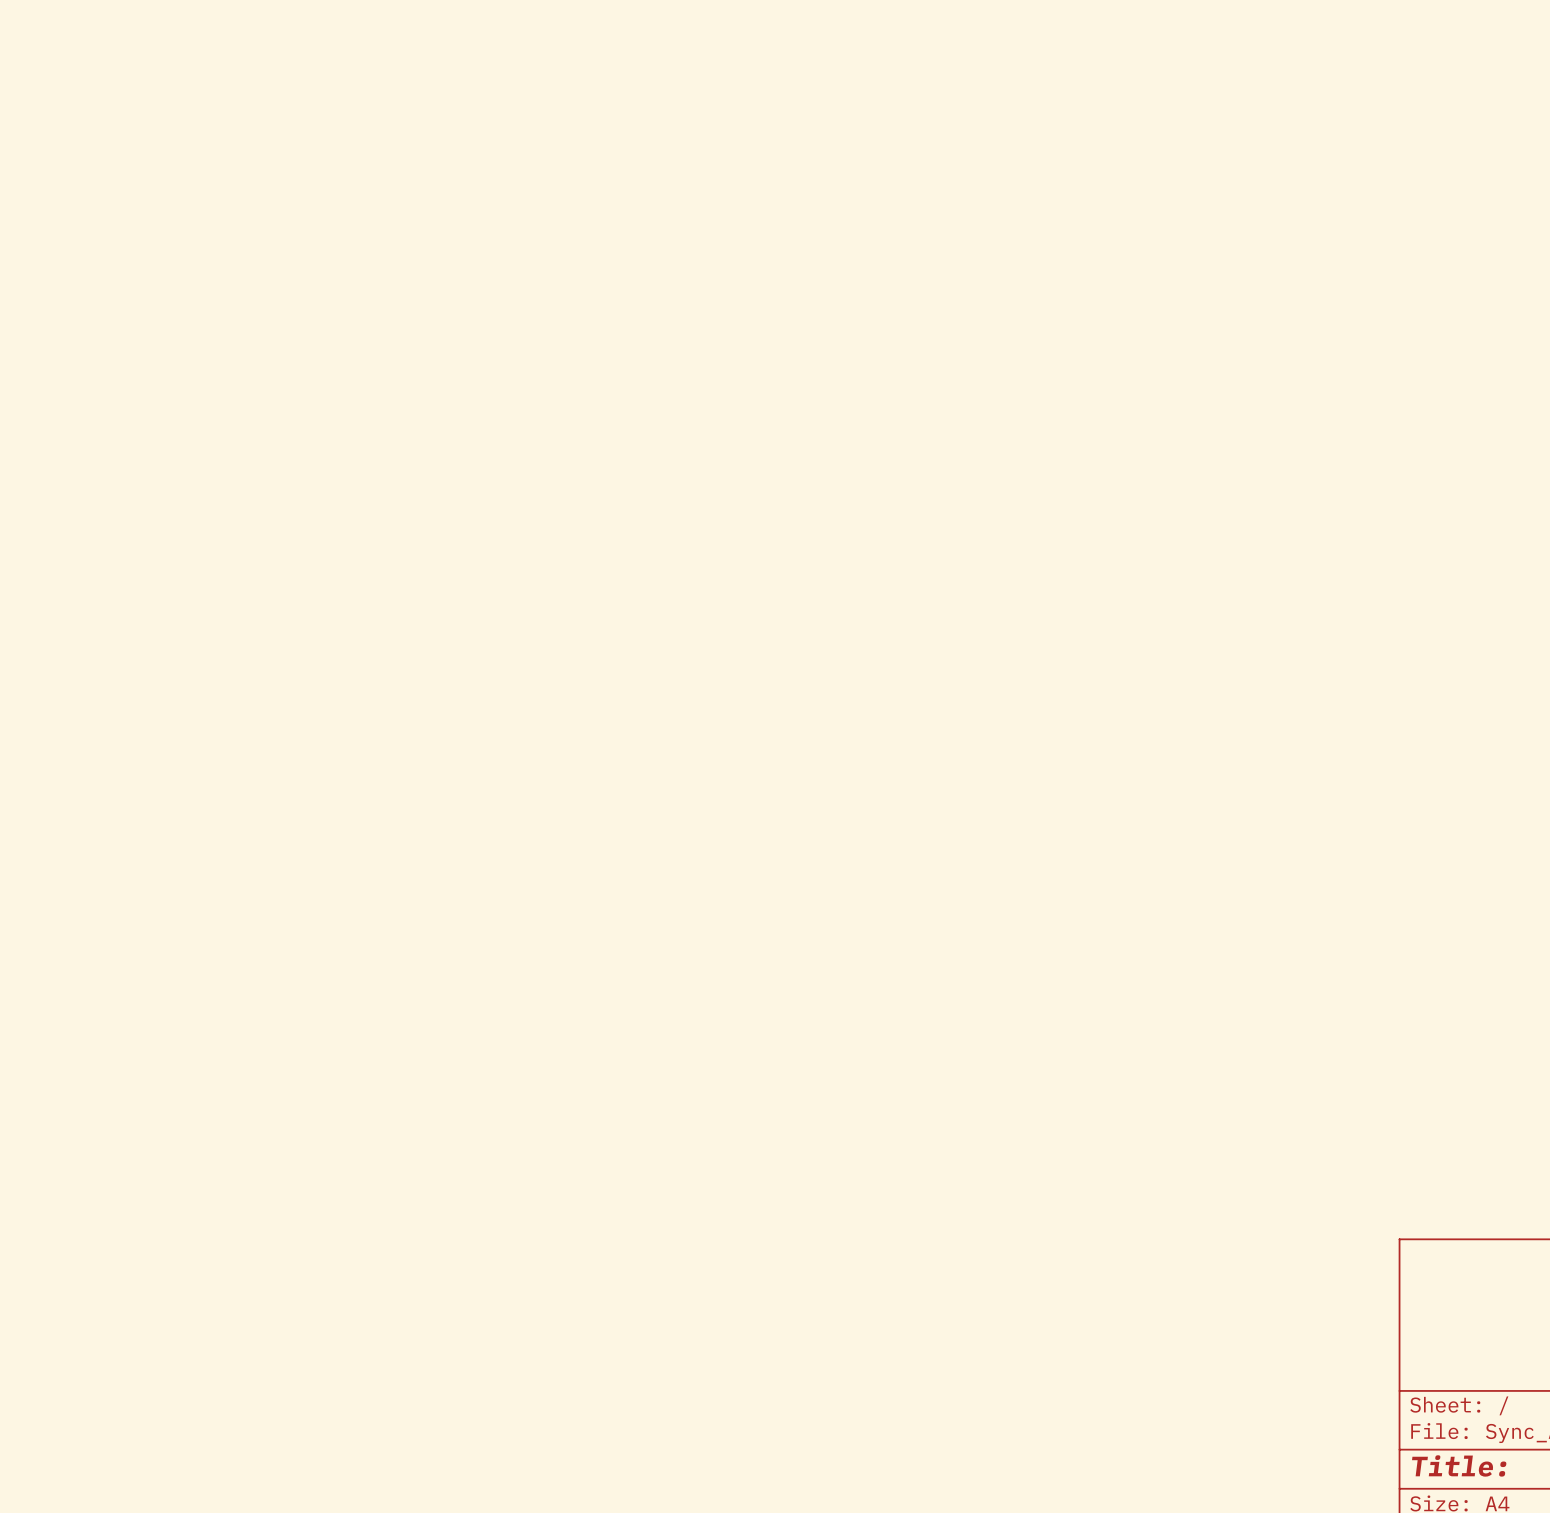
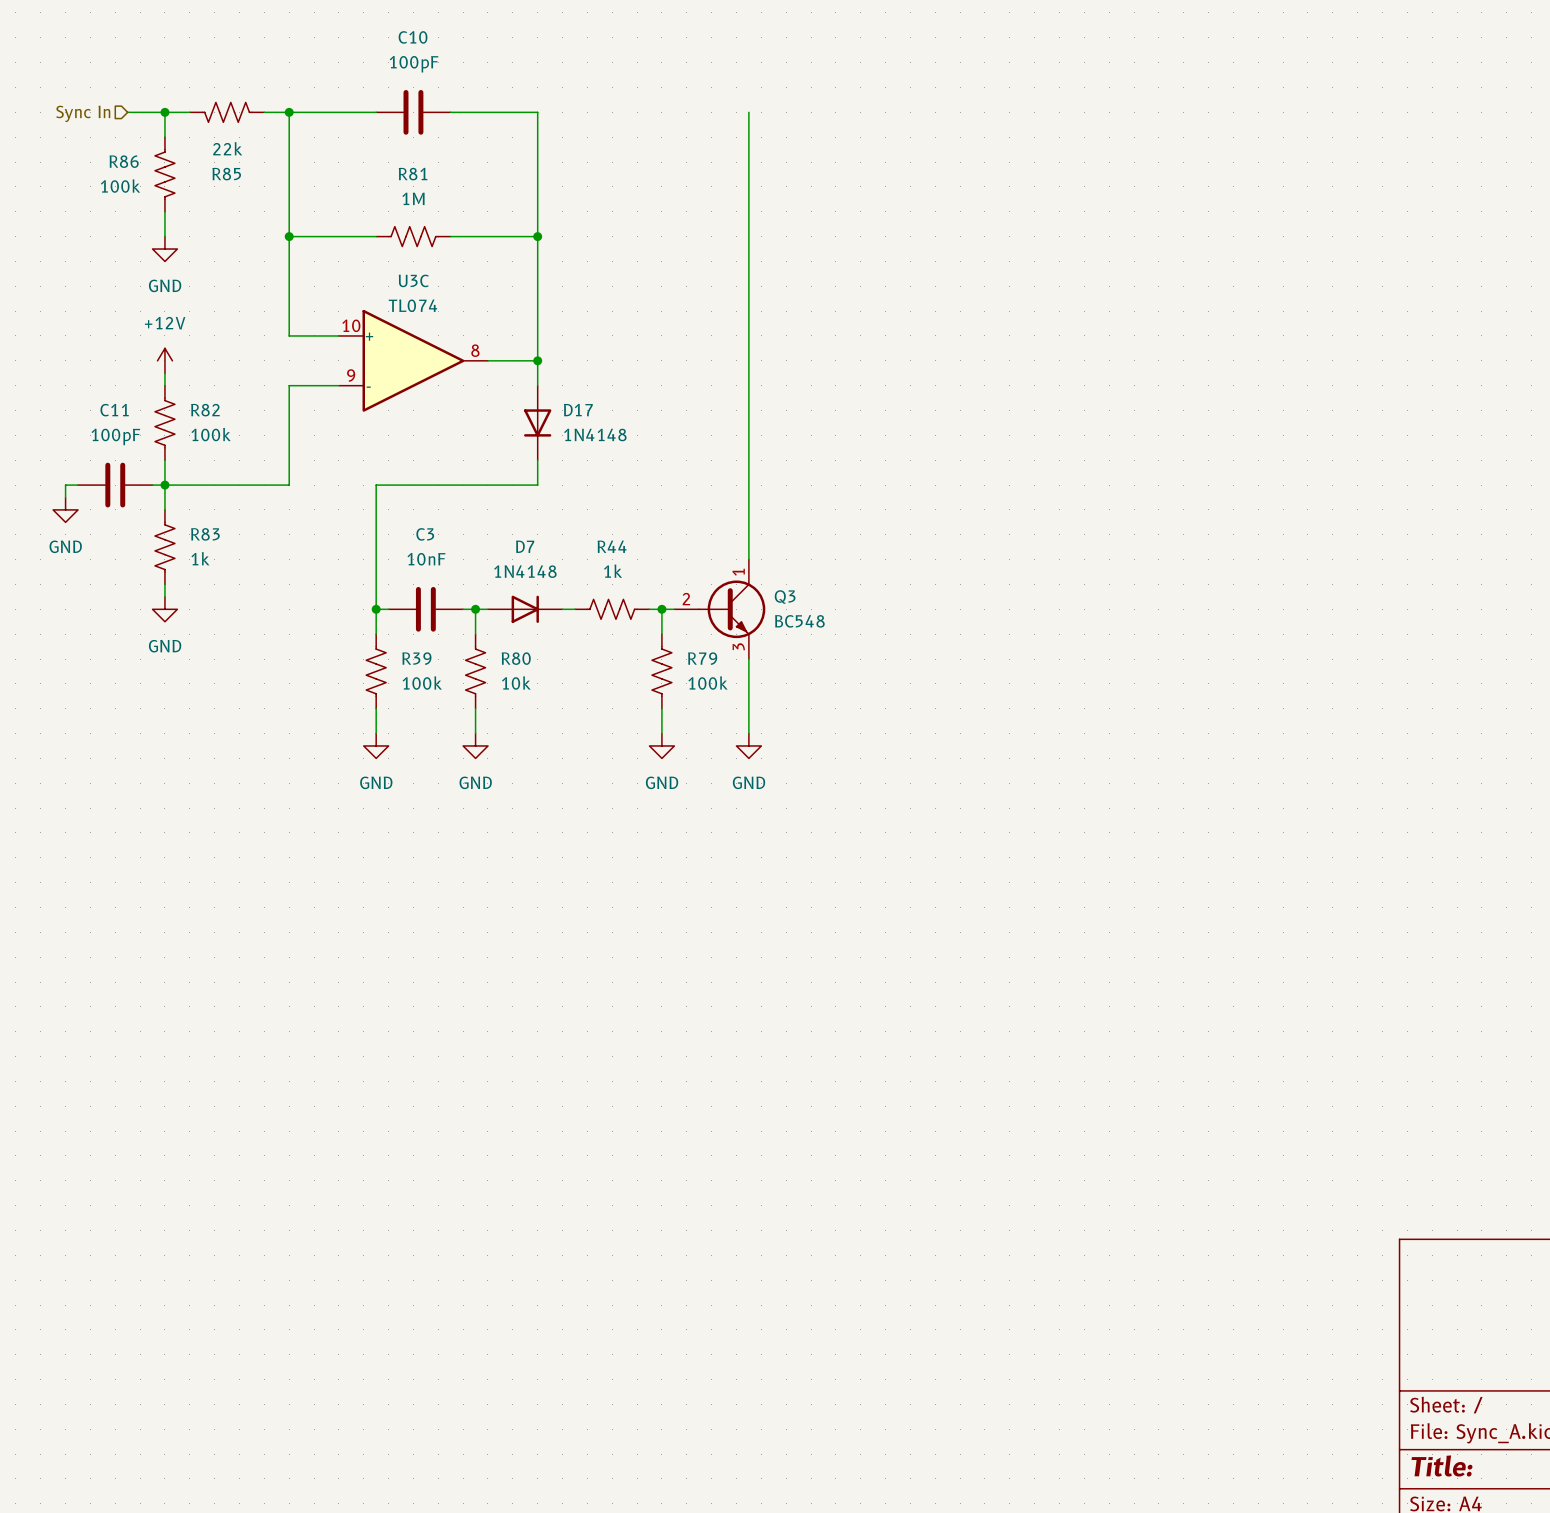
wire: none -> (127, 112) (189, 112)
wire: none -> (164, 112) (164, 137)
junction: none -> (164, 112)
R85: none -> 22k (227, 112)
wire: none -> (264, 112) (376, 112)
wire: none -> (289, 112) (289, 335) (338, 335)
junction: none -> (289, 112)
C10: none -> 100pF (413, 112)
wire: none -> (450, 112) (537, 112) (537, 385)
wire: none -> (748, 112) (748, 559)
hierarchical label: none -> Sync In (83, 113)
R86: none -> 100k (164, 174)
wire: none -> (164, 211) (164, 236)
wire: none -> (289, 236) (376, 236)
junction: none -> (289, 236)
R81: none -> 1M (413, 236)
wire: none -> (450, 236) (537, 236)
junction: none -> (537, 236)
power symbol: none -> GND (164, 249)
power symbol: none -> +12V (164, 360)
U3C: none -> TL074 (413, 360)
wire: none -> (487, 360) (537, 360)
junction: none -> (537, 360)
wire: none -> (164, 373) (164, 385)
wire: none -> (338, 385) (289, 385) (289, 485) (152, 485)
R82: none -> 100k (164, 422)
D17: none -> 1N4148 (537, 422)
wire: none -> (164, 460) (164, 509)
wire: none -> (537, 460) (537, 485) (376, 485) (376, 634)
wire: none -> (78, 485) (65, 485) (65, 497)
C11: none -> 100pF (115, 485)
junction: none -> (164, 485)
power symbol: none -> GND (65, 509)
R83: none -> 1k (164, 547)
wire: none -> (164, 584) (164, 596)
power symbol: none -> GND (164, 609)
wire: none -> (376, 609) (388, 609)
junction: none -> (376, 609)
C3: none -> 10nF (425, 609)
wire: none -> (463, 609) (487, 609)
wire: none -> (475, 609) (475, 634)
junction: none -> (475, 609)
D7: none -> 1N4148 (525, 609)
wire: none -> (562, 609) (574, 609)
R44: none -> 1k (612, 609)
wire: none -> (649, 609) (674, 609)
wire: none -> (661, 609) (661, 634)
junction: none -> (661, 609)
Q3: none -> BC548 (719, 609)
wire: none -> (748, 659) (748, 733)
R39: none -> 100k (376, 671)
R80: none -> 10k (475, 671)
R79: none -> 100k (661, 671)
wire: none -> (376, 708) (376, 733)
wire: none -> (475, 708) (475, 733)
wire: none -> (661, 708) (661, 733)
power symbol: none -> GND (376, 745)
power symbol: none -> GND (475, 745)
power symbol: none -> GND (661, 745)
power symbol: none -> GND (748, 745)

